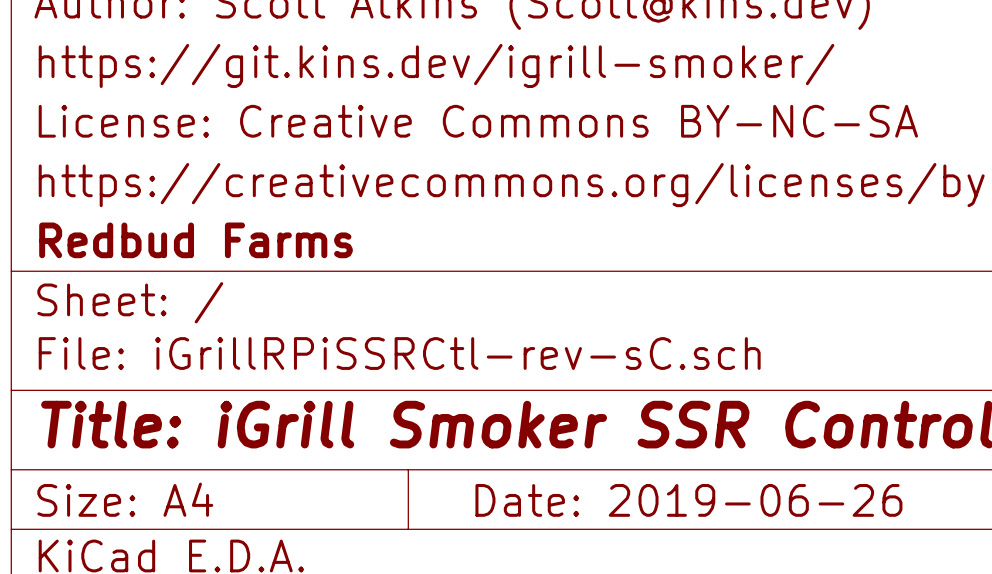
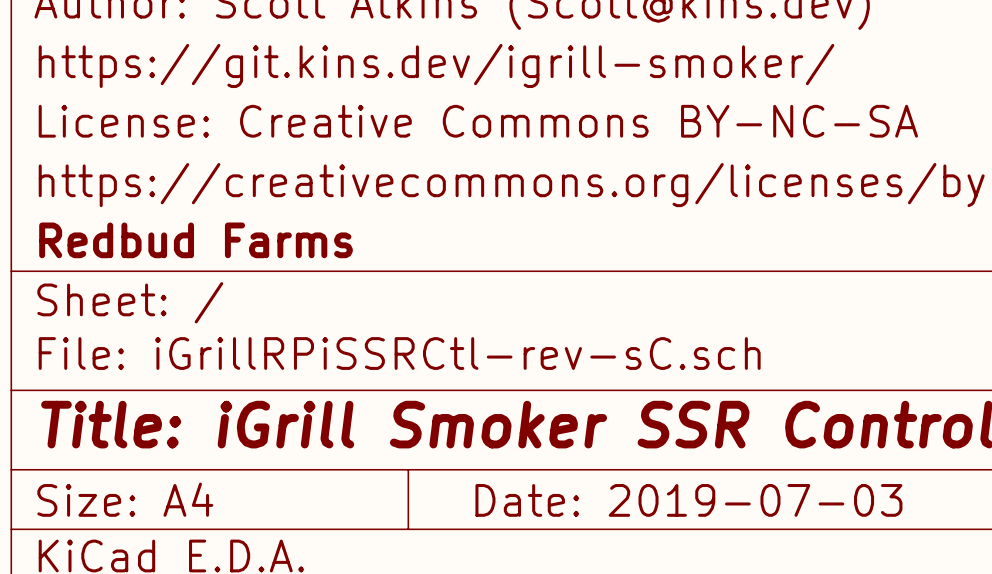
title block: Date: 2019-06-26 (688, 500) -> Date: 2019-07-03 (688, 500)

